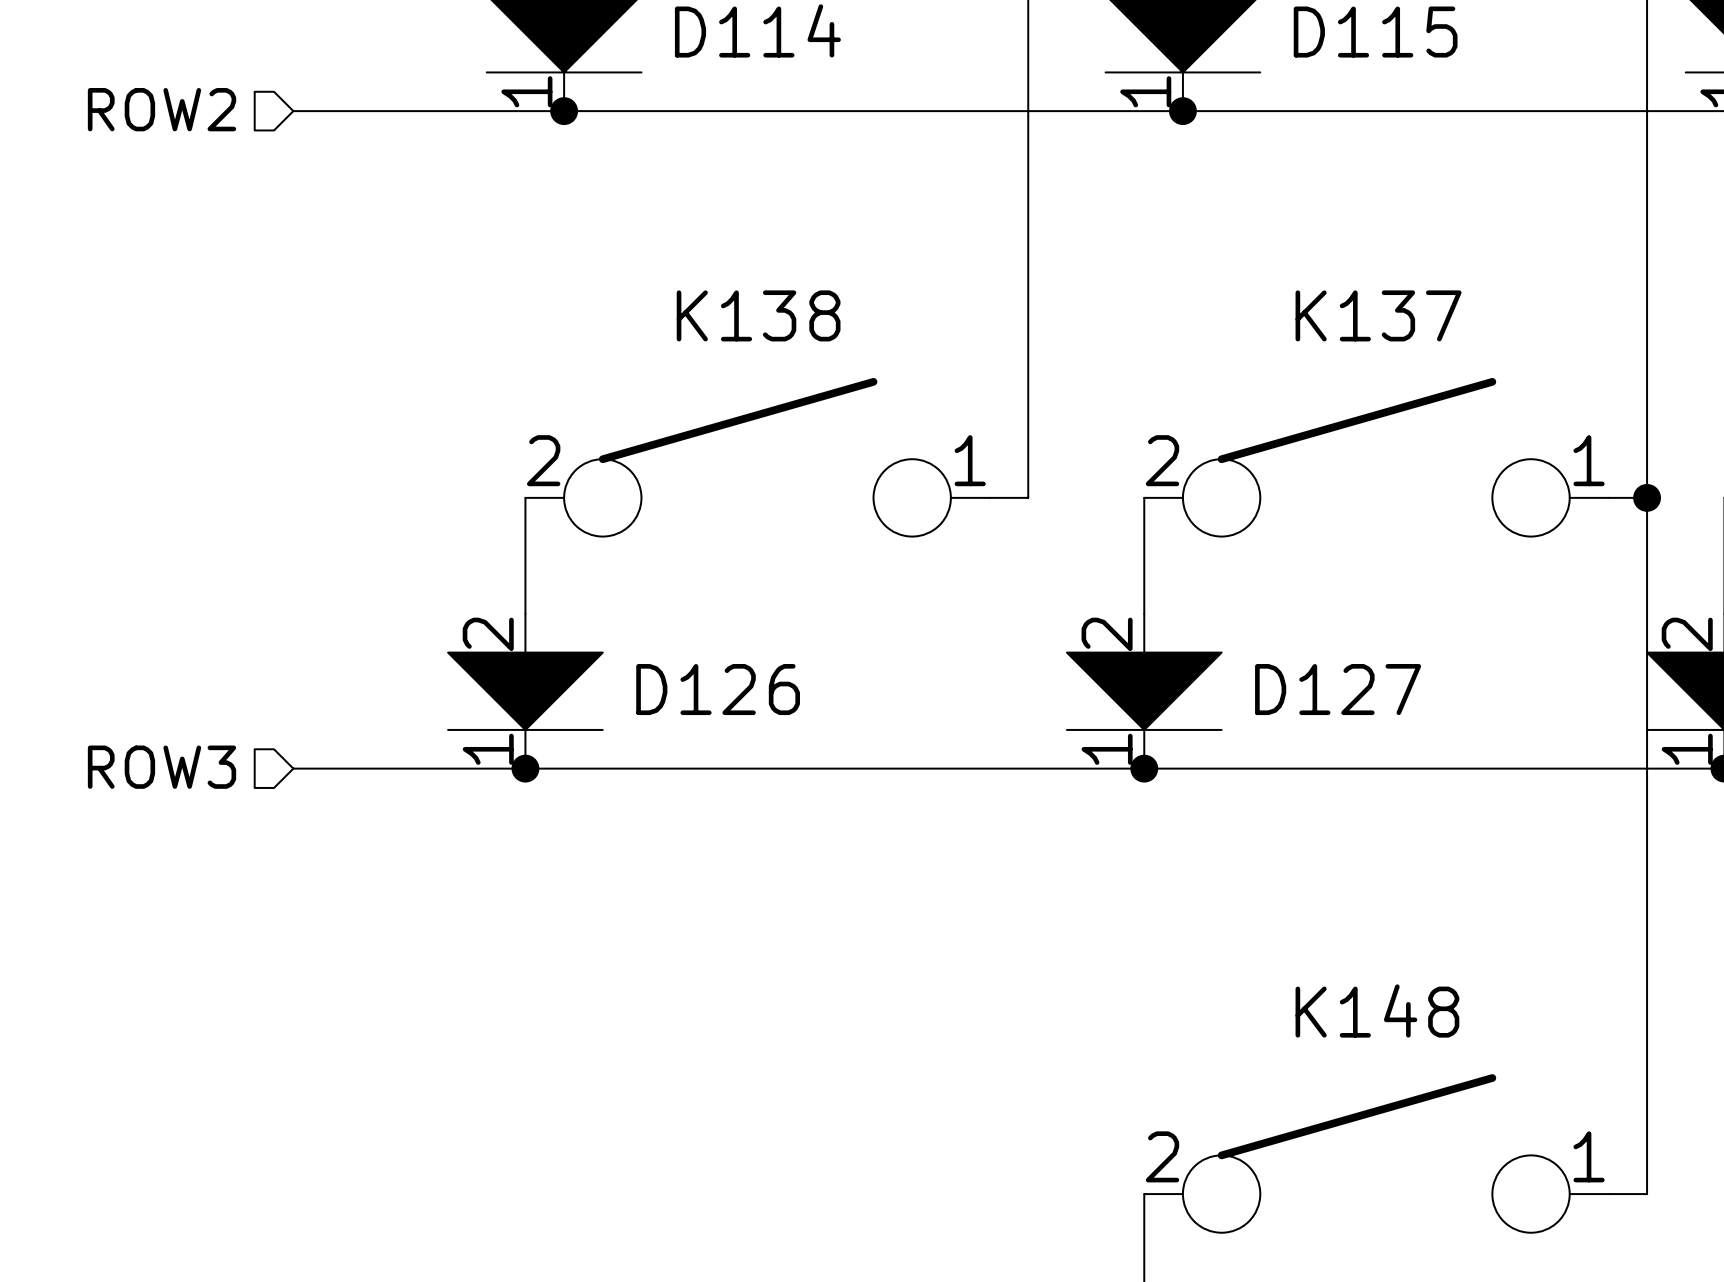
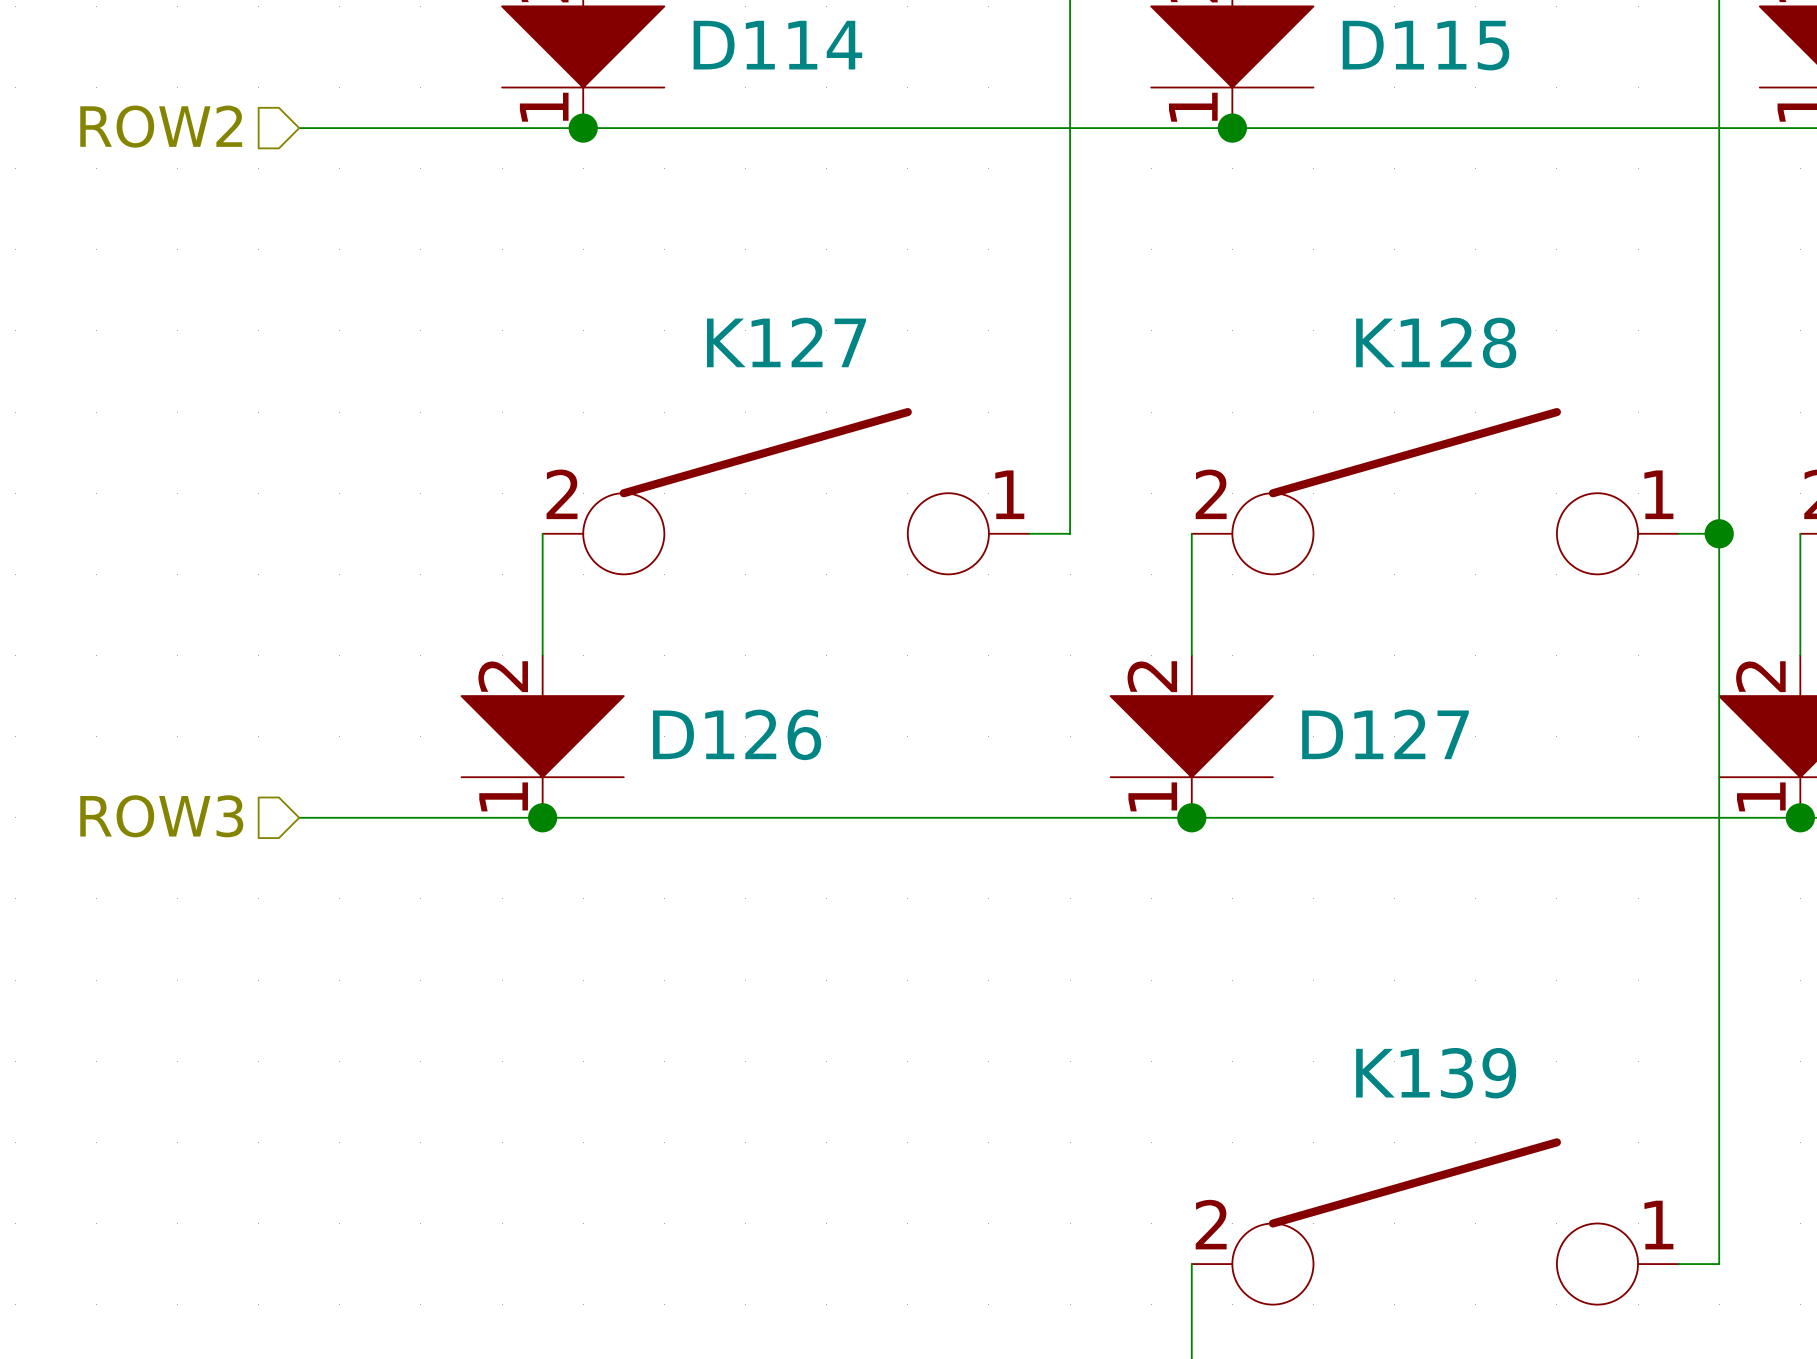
K138 name: K138 (758, 315) -> K127 (786, 342)
K137 name: K137 (1378, 315) -> K128 (1436, 342)
K148 name: K148 (1377, 1010) -> K139 (1436, 1073)

